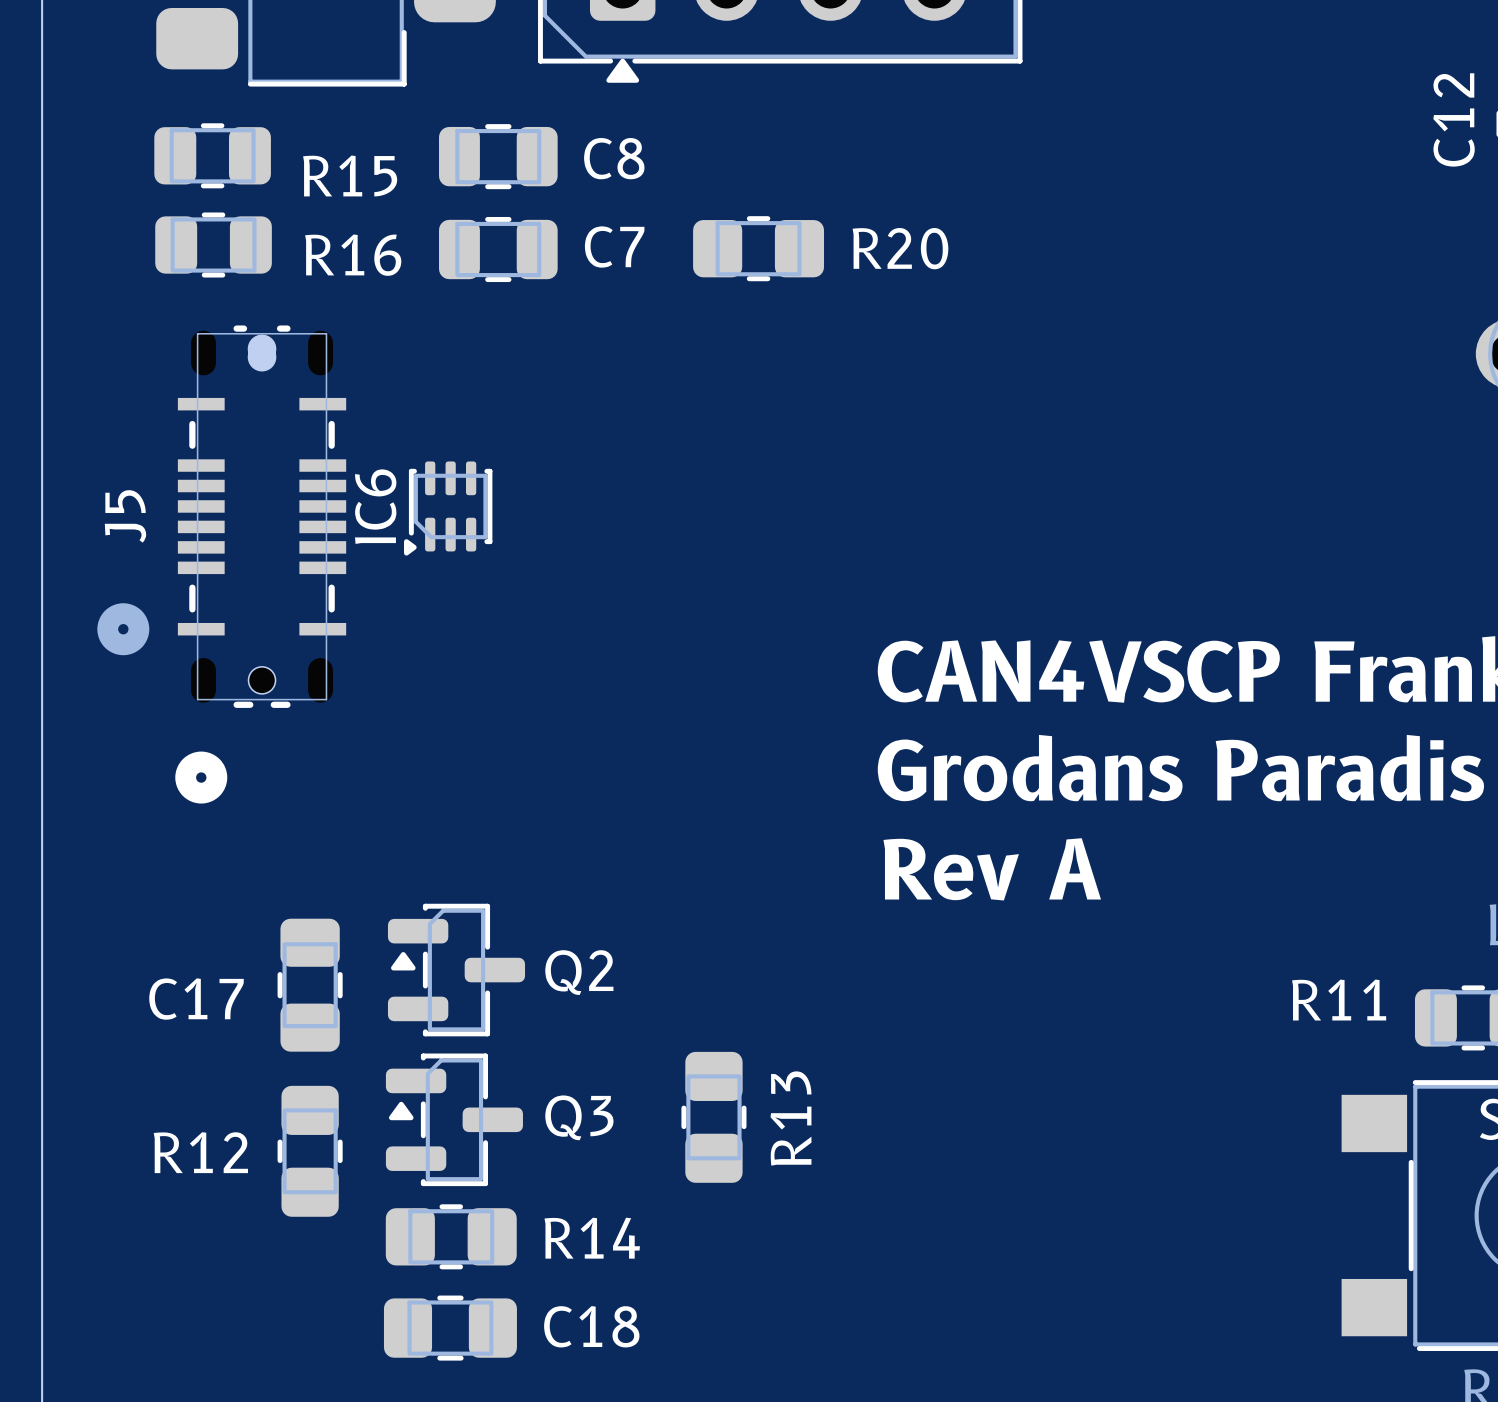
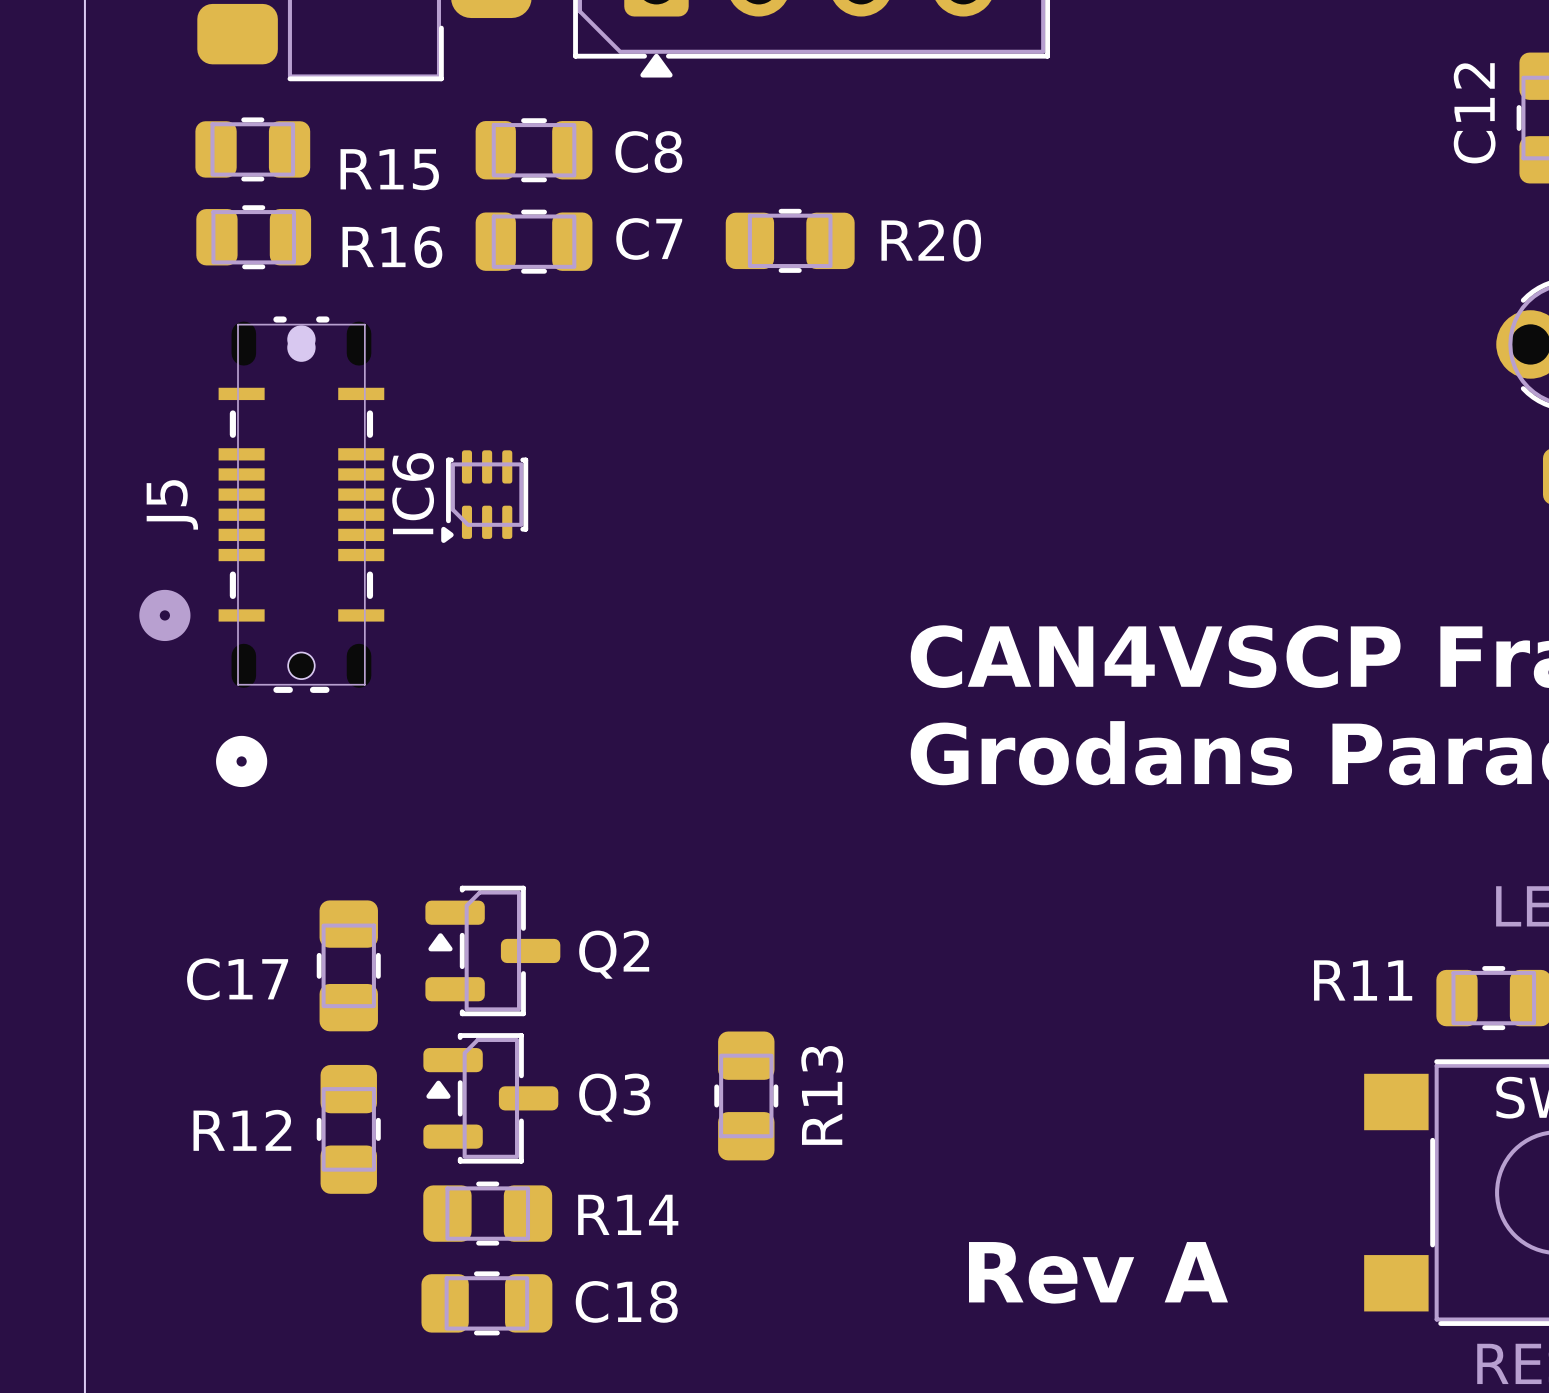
text position: Rev A (992, 869) -> Rev A (1098, 1272)

